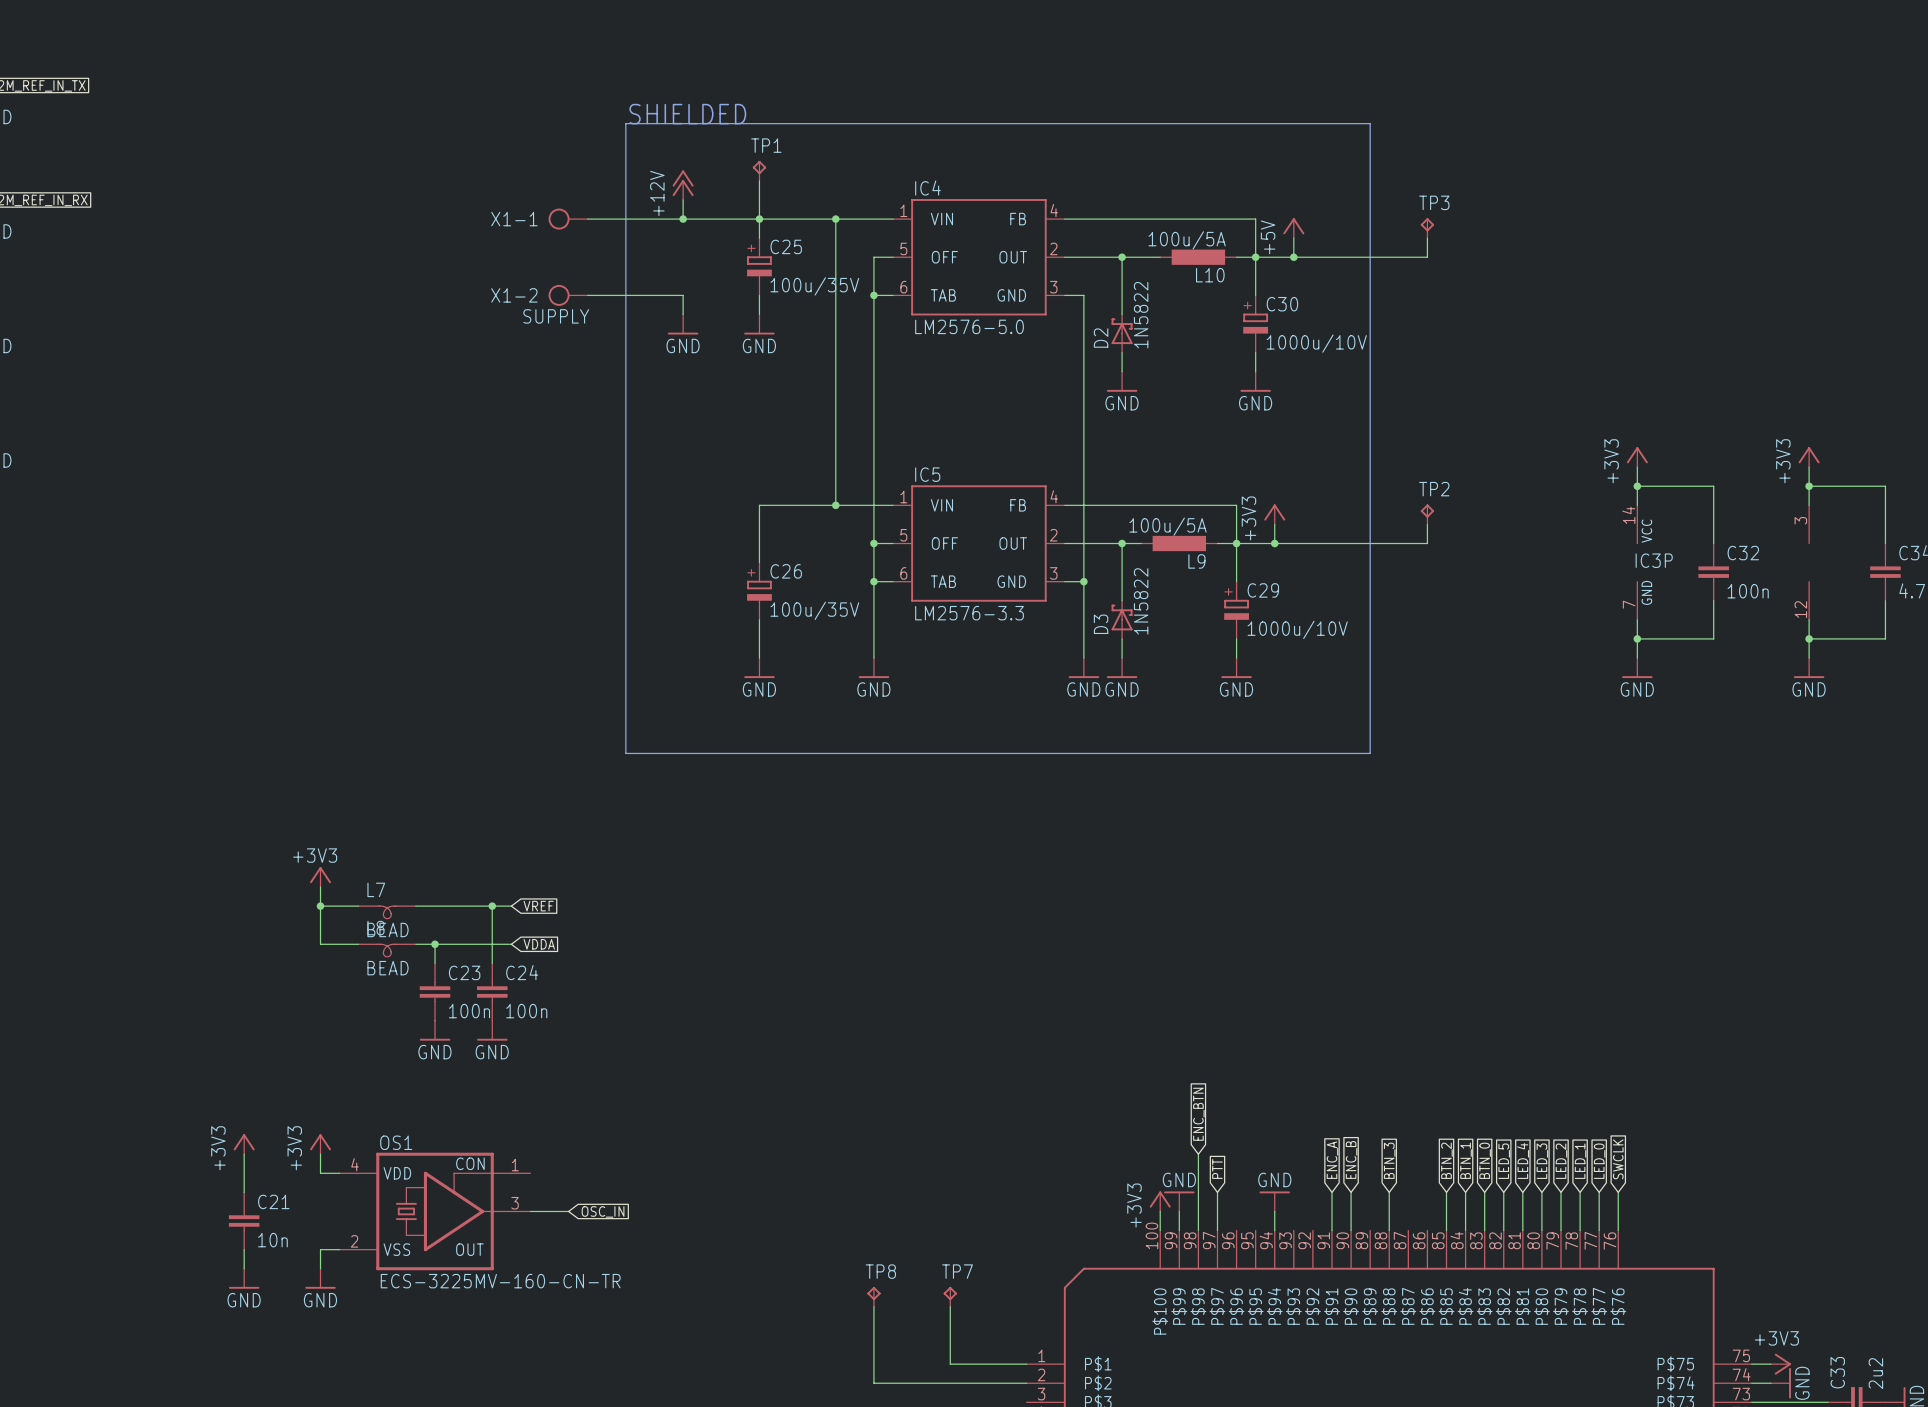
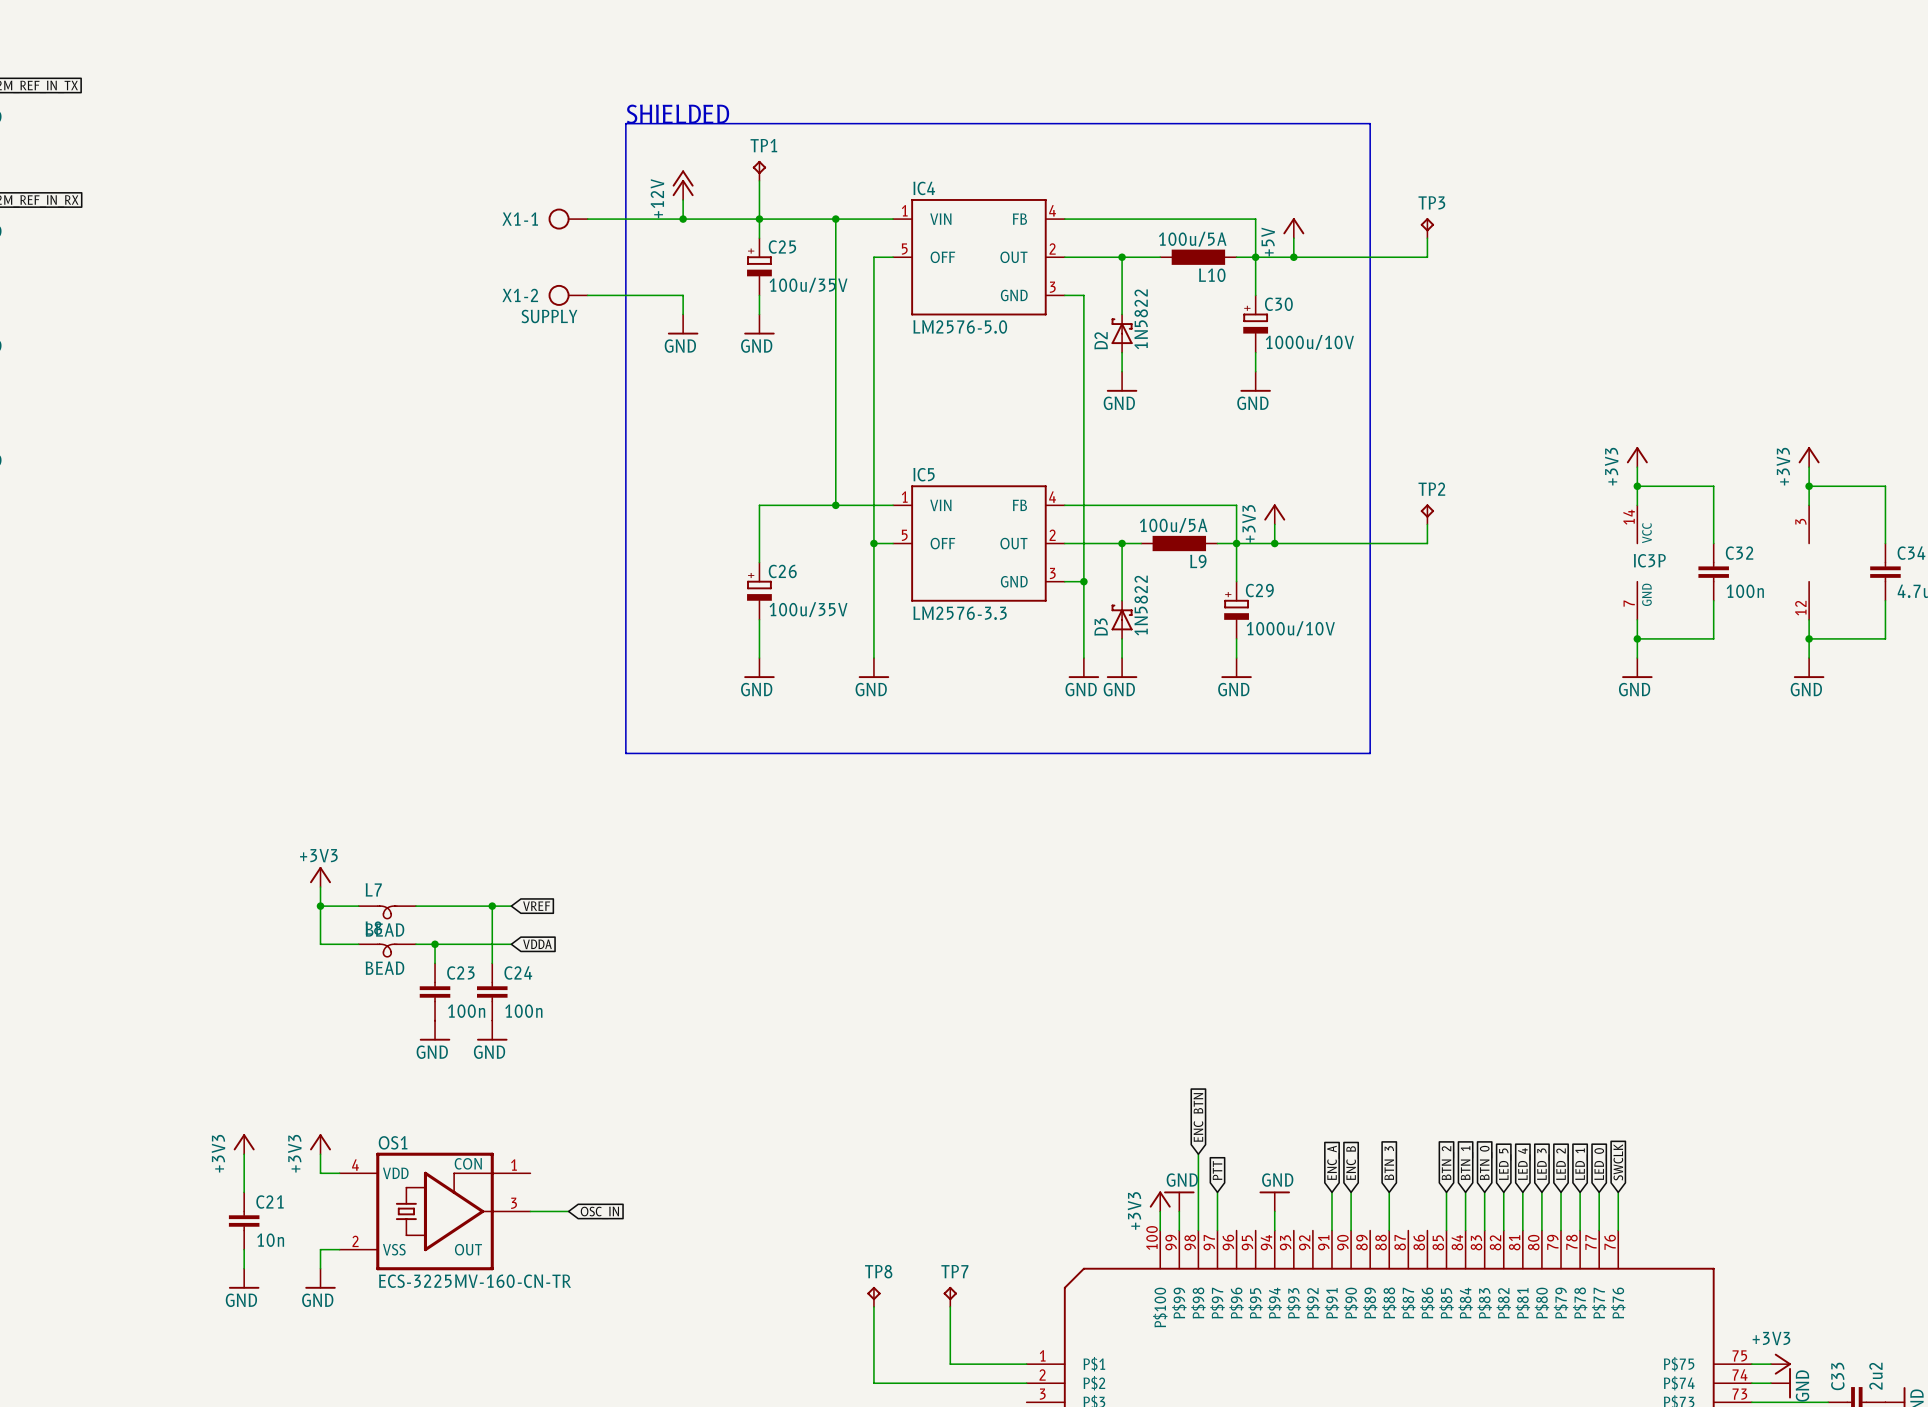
IC4 symbol: [893, 199, 1065, 316] -> [893, 199, 1065, 316]
wire: (873, 295) (893, 295) -> none
junction: (873, 295) -> none
IC5 symbol: [893, 485, 1065, 602] -> [893, 485, 1065, 602]
wire: (873, 581) (893, 581) -> none
junction: (873, 581) -> none

